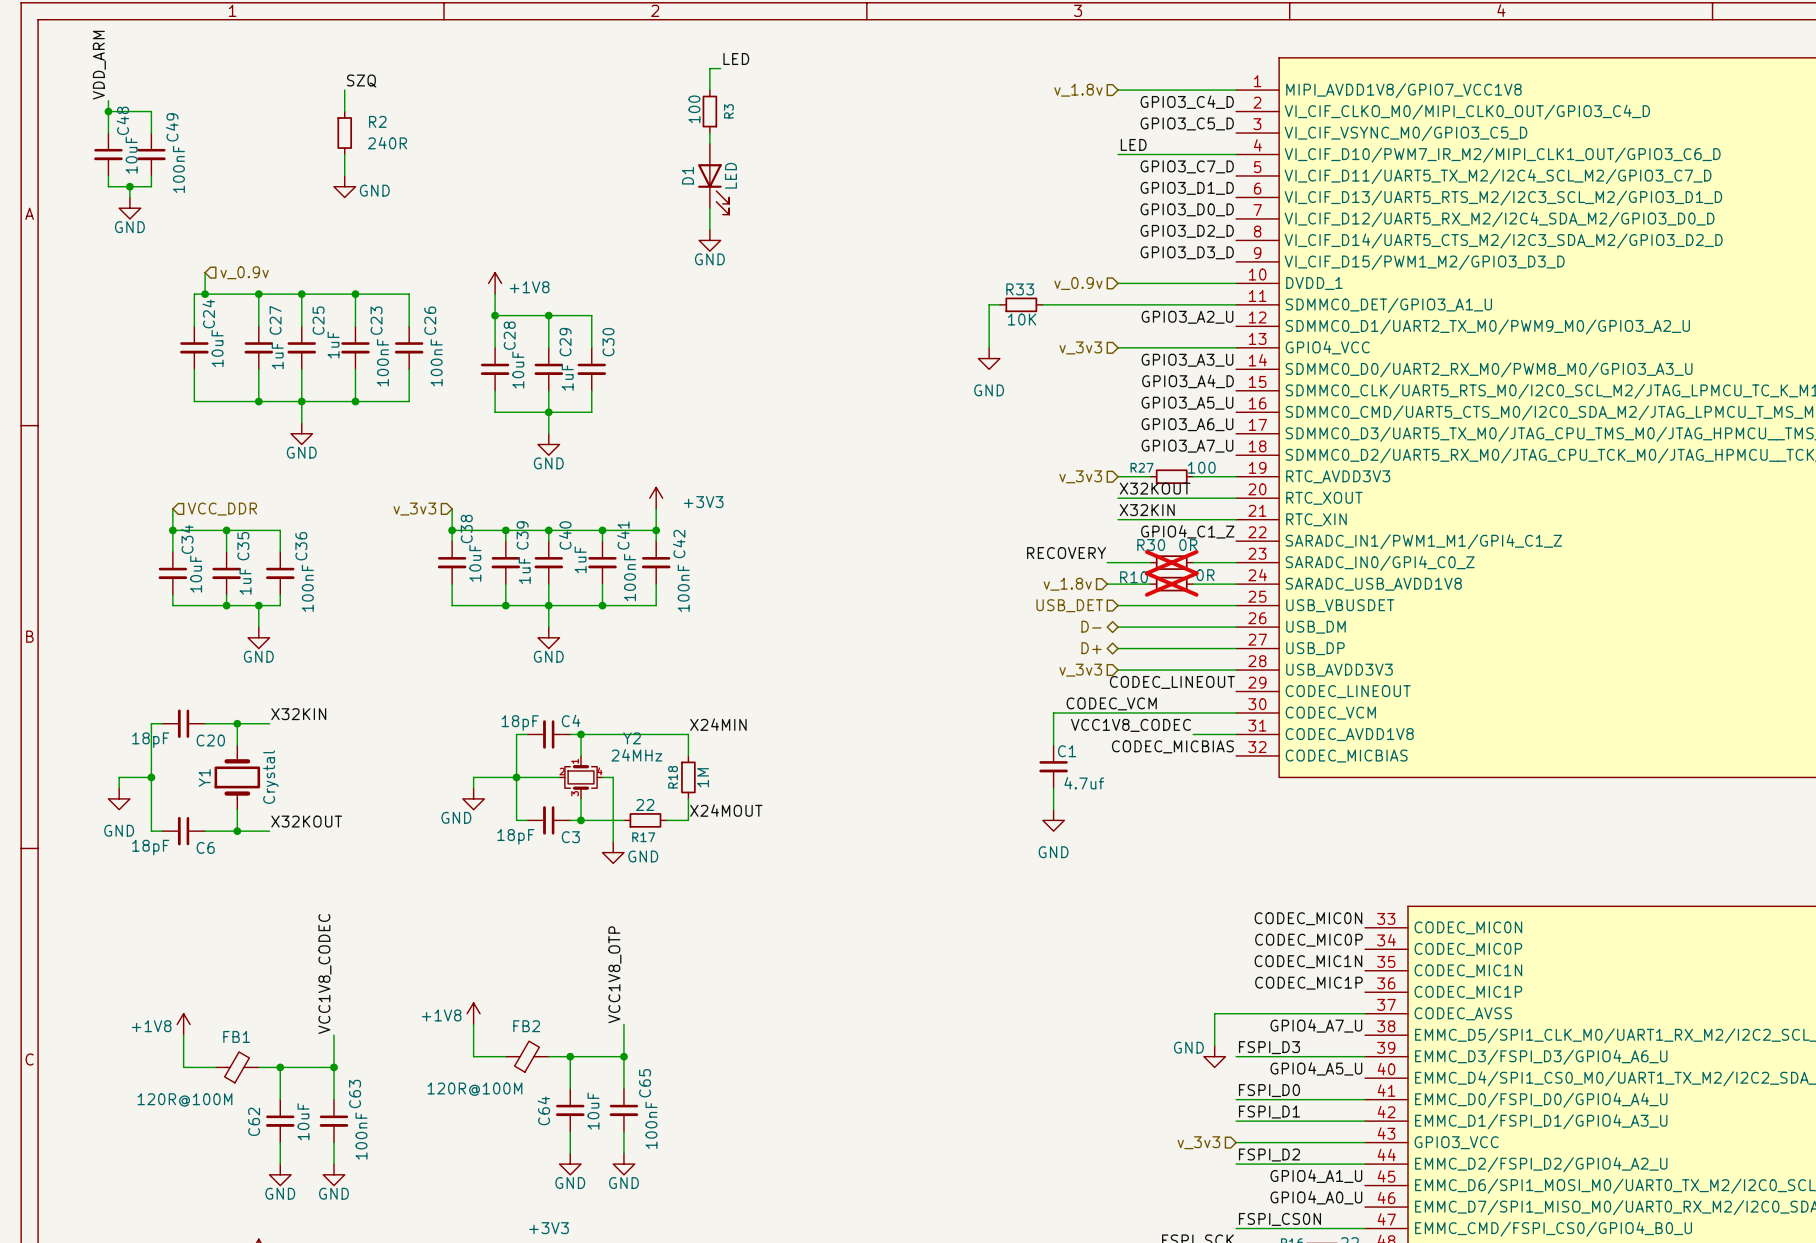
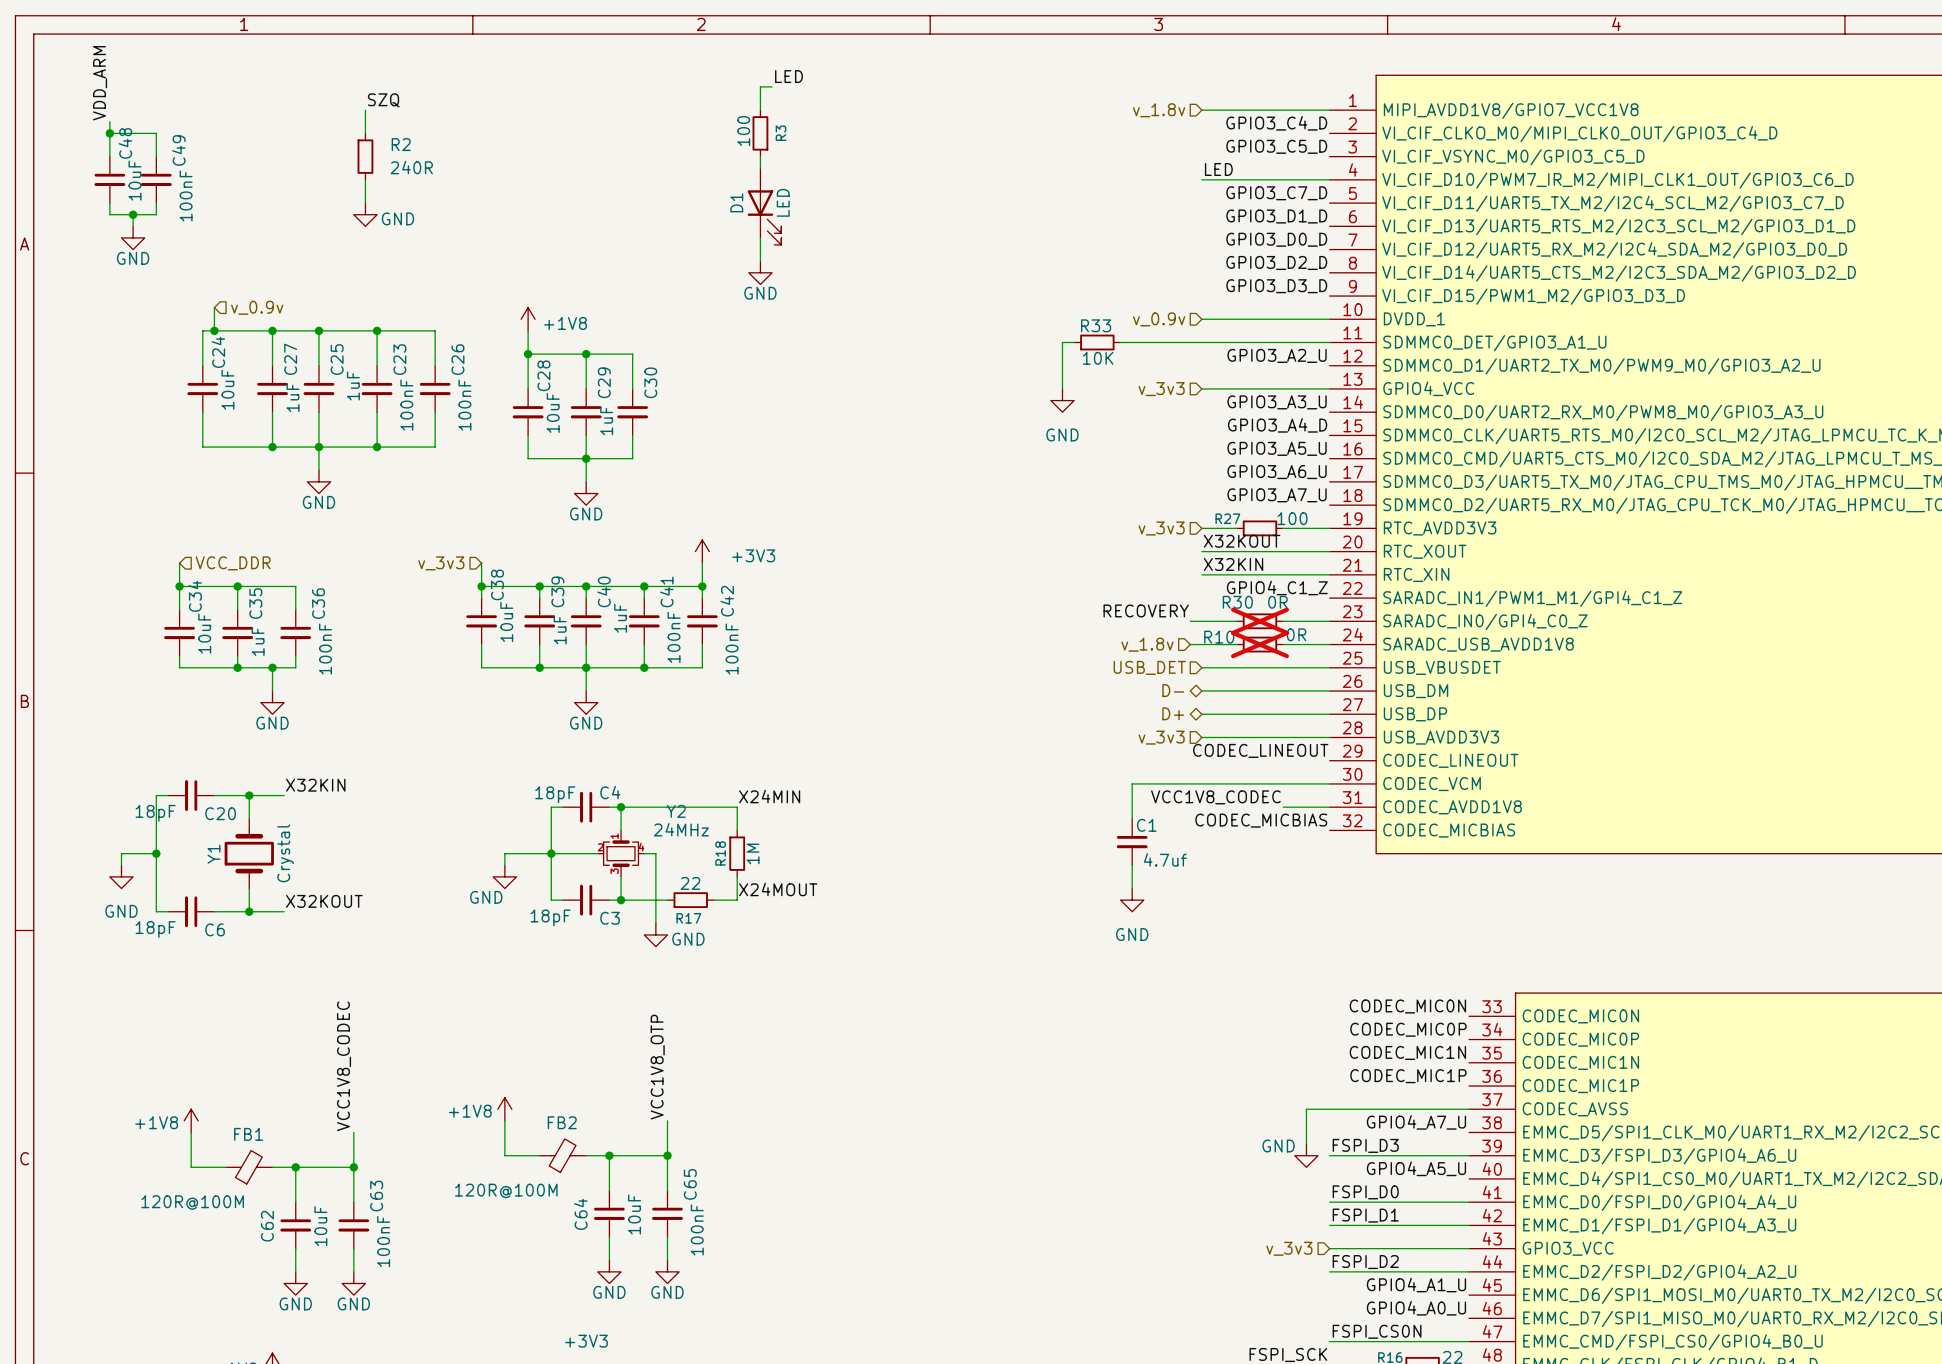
label: CODEC_VCM (1111, 703) -> none

